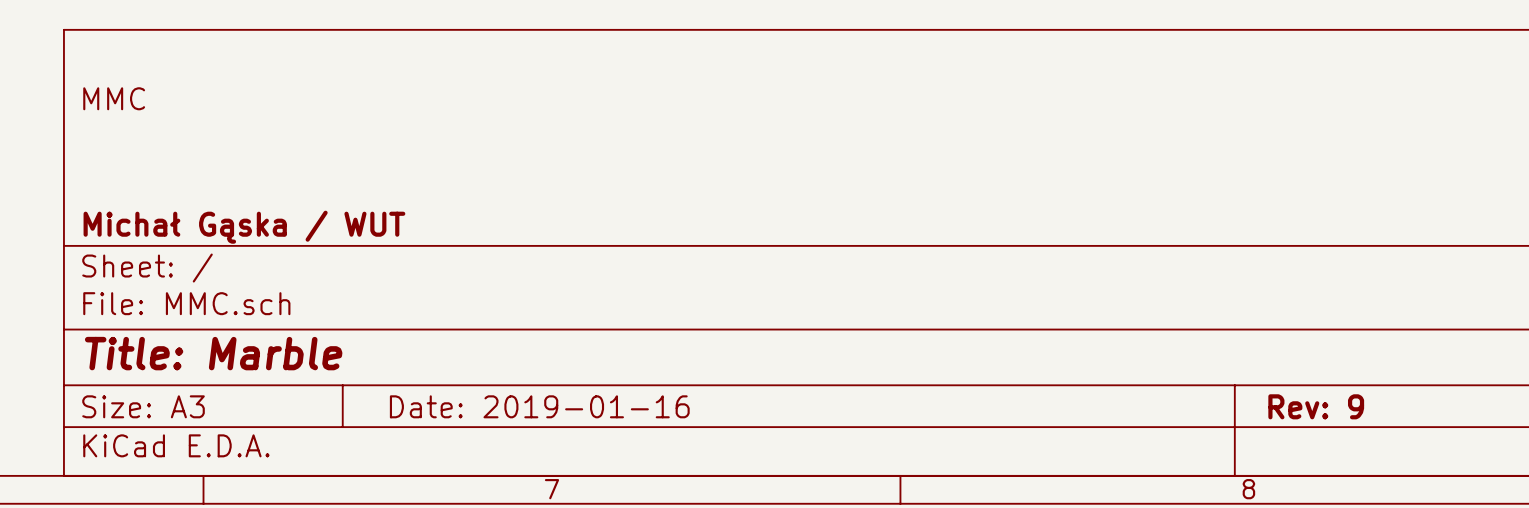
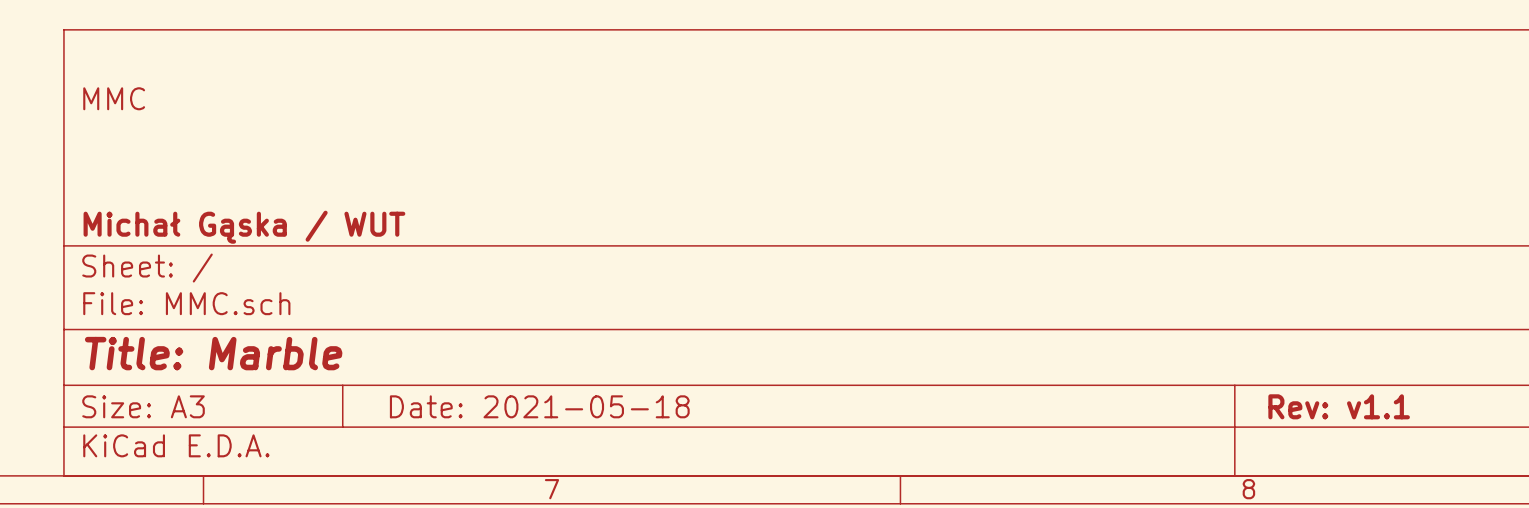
title block: Date: 2019-01-16 (539, 406) -> Date: 2021-05-18 (539, 406)
title block: Rev: 9 (1316, 406) -> Rev: v1.1 (1339, 406)

